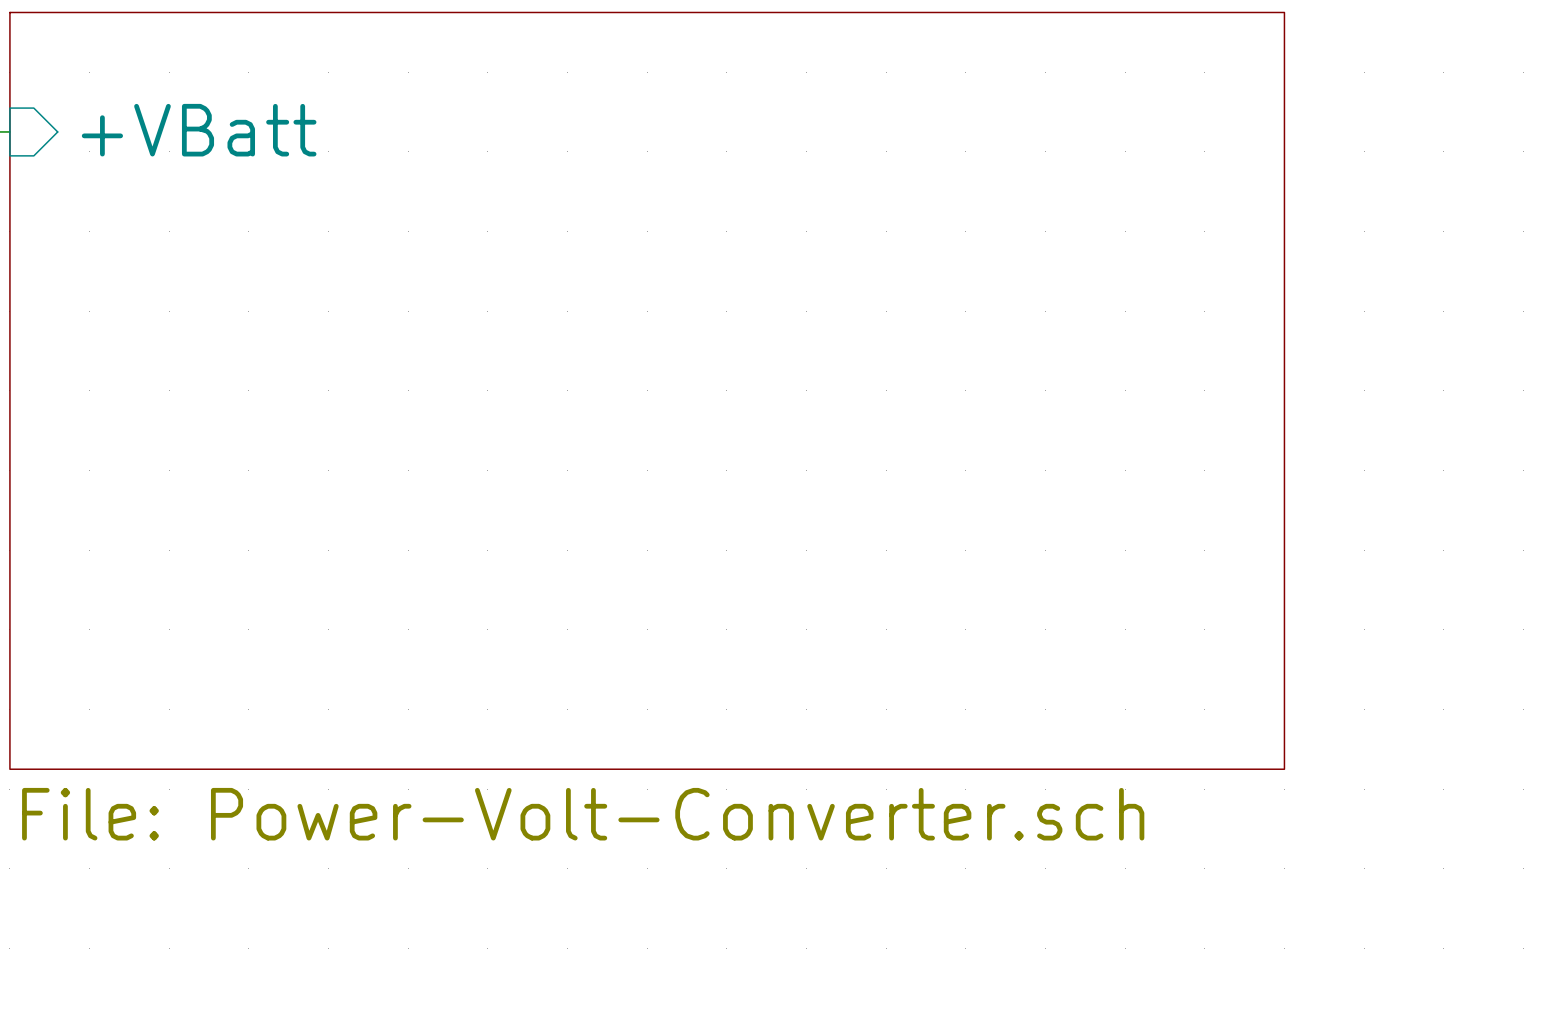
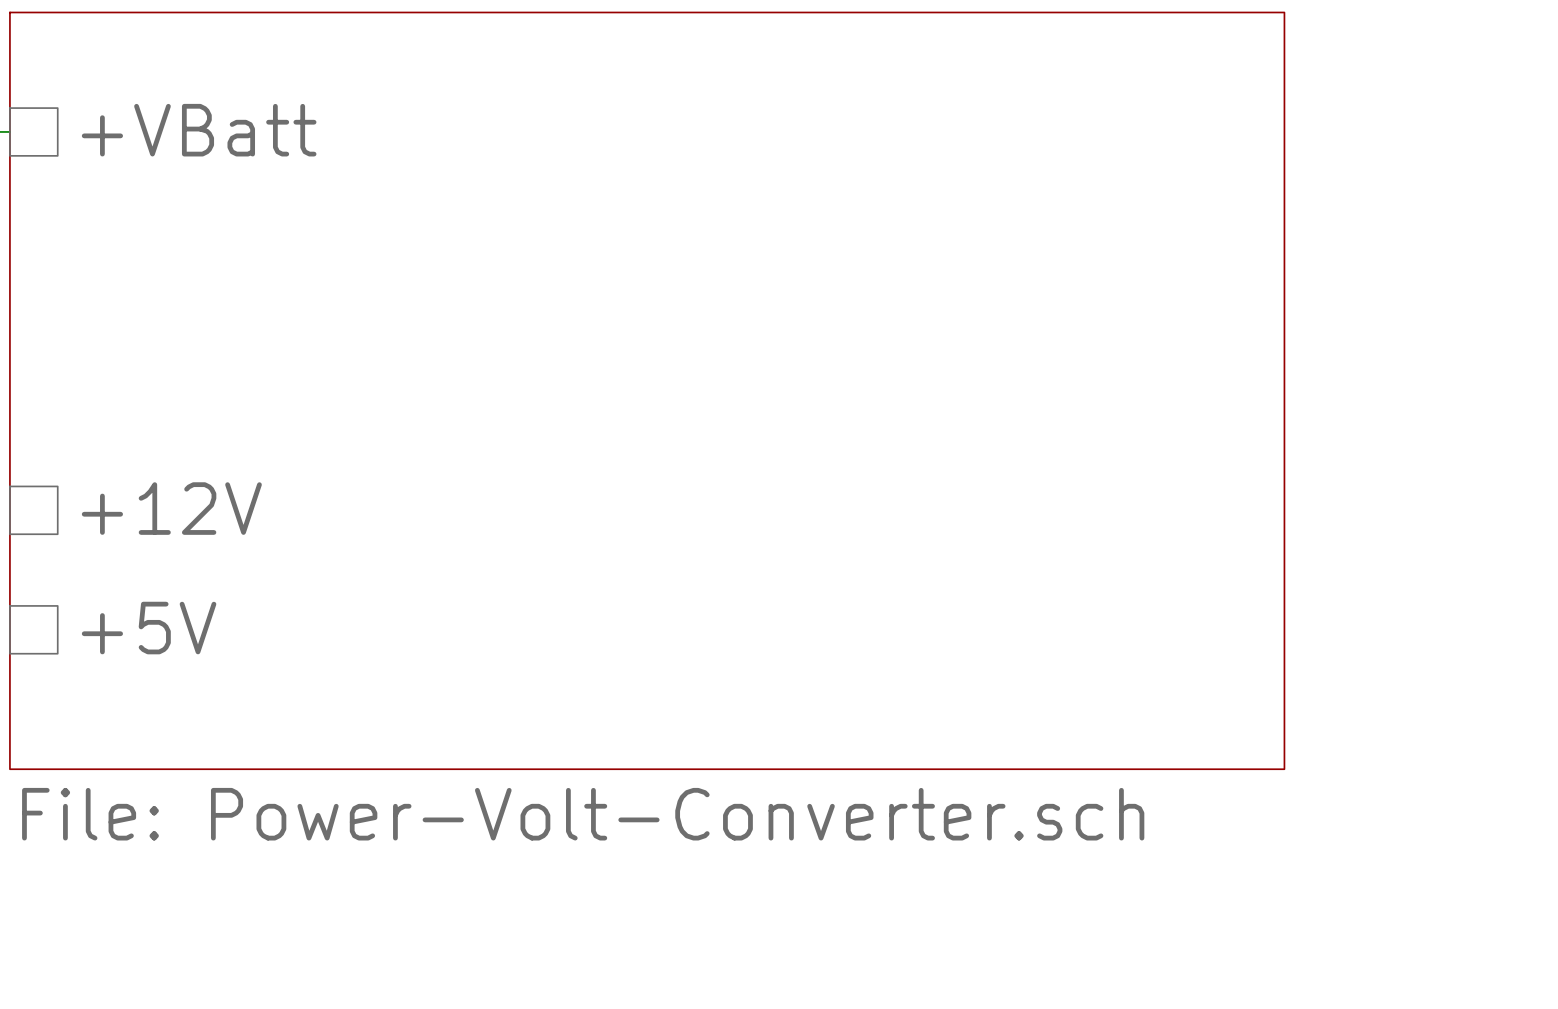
sheet pin shape: input (199, 130) -> passive (199, 130)
sheet pin: none -> +12V (171, 508)
sheet pin: none -> +5V (149, 628)

